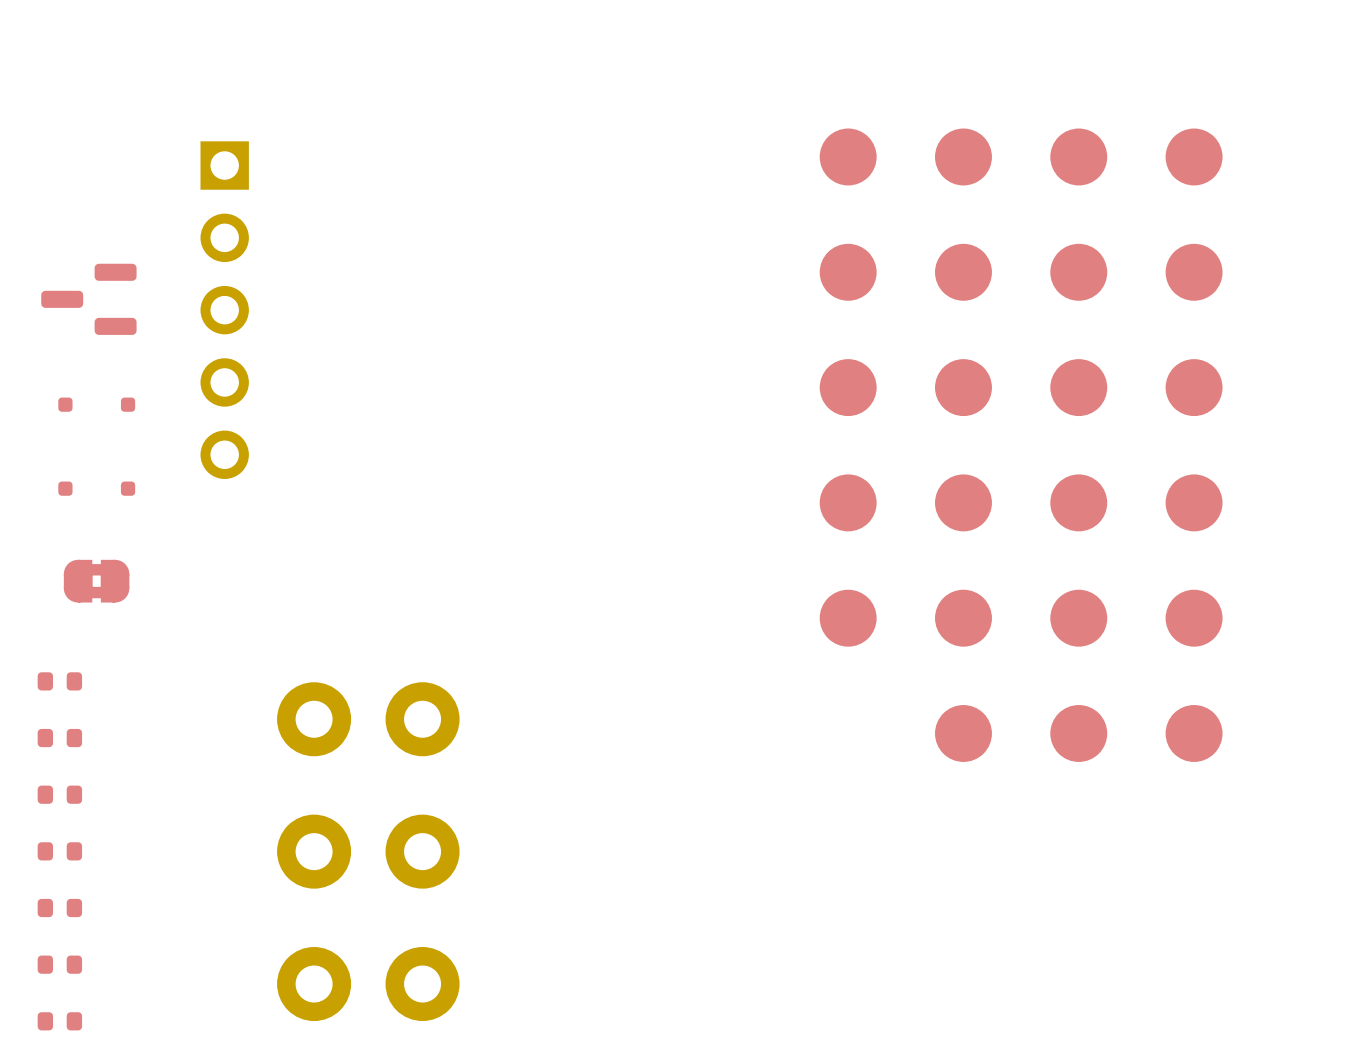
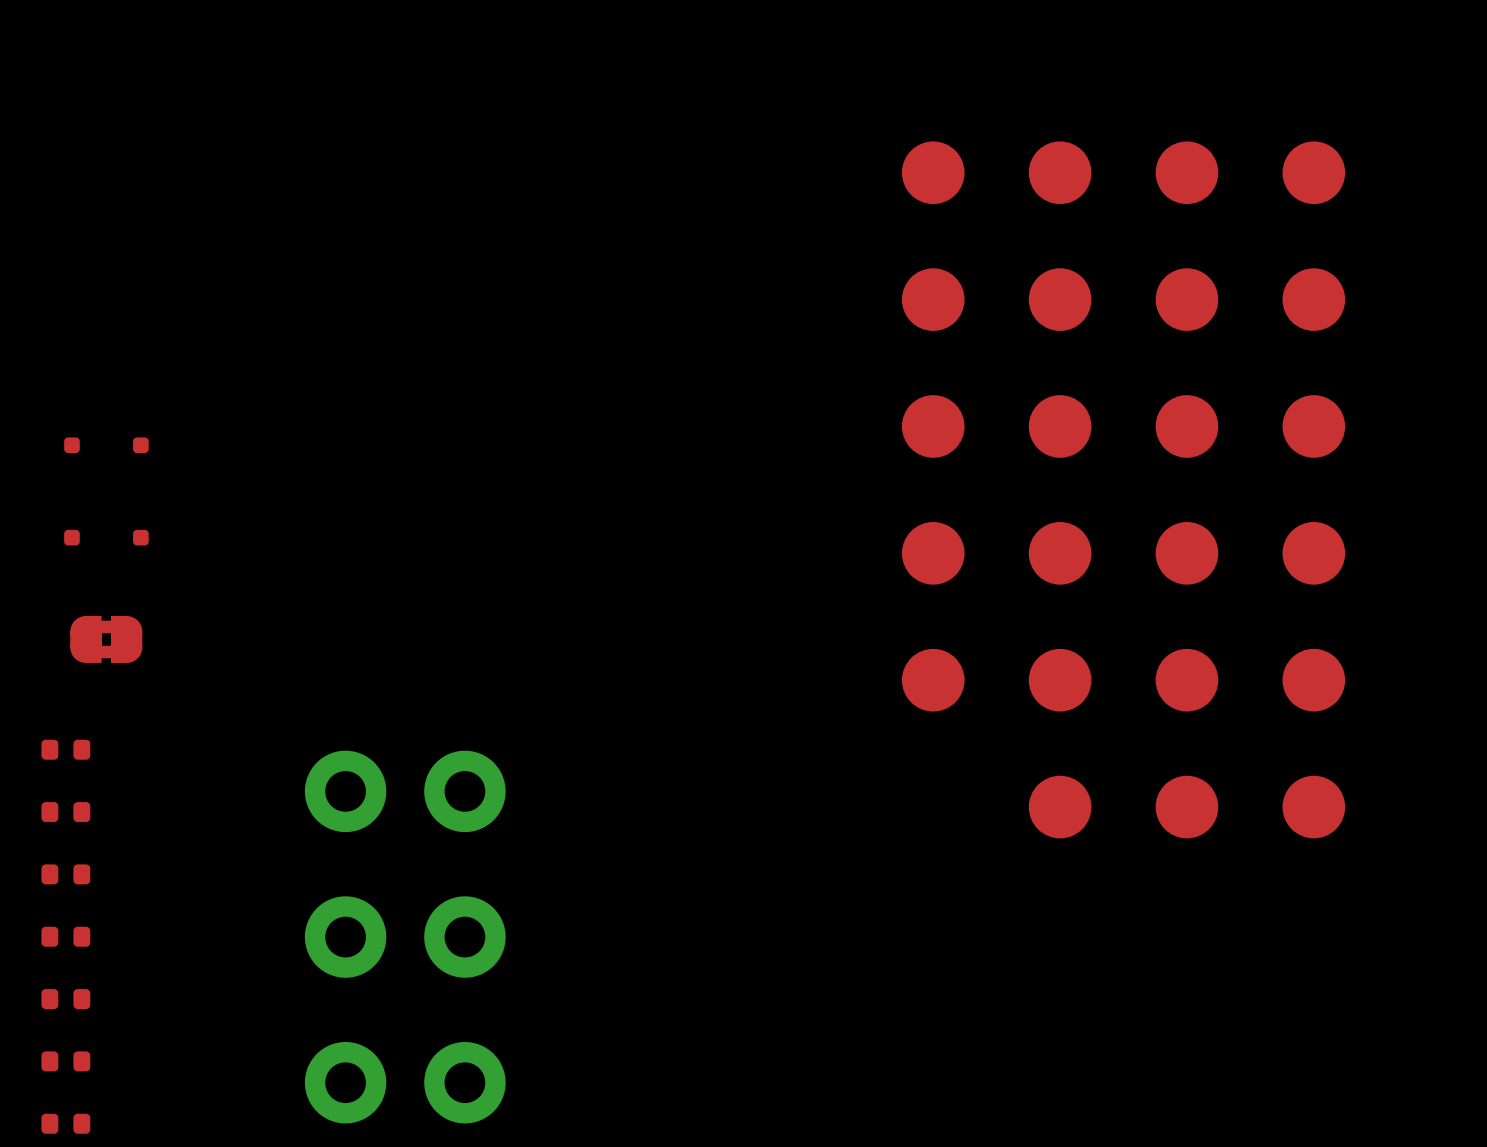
part: (88, 299) -> none
part: (224, 310) -> none

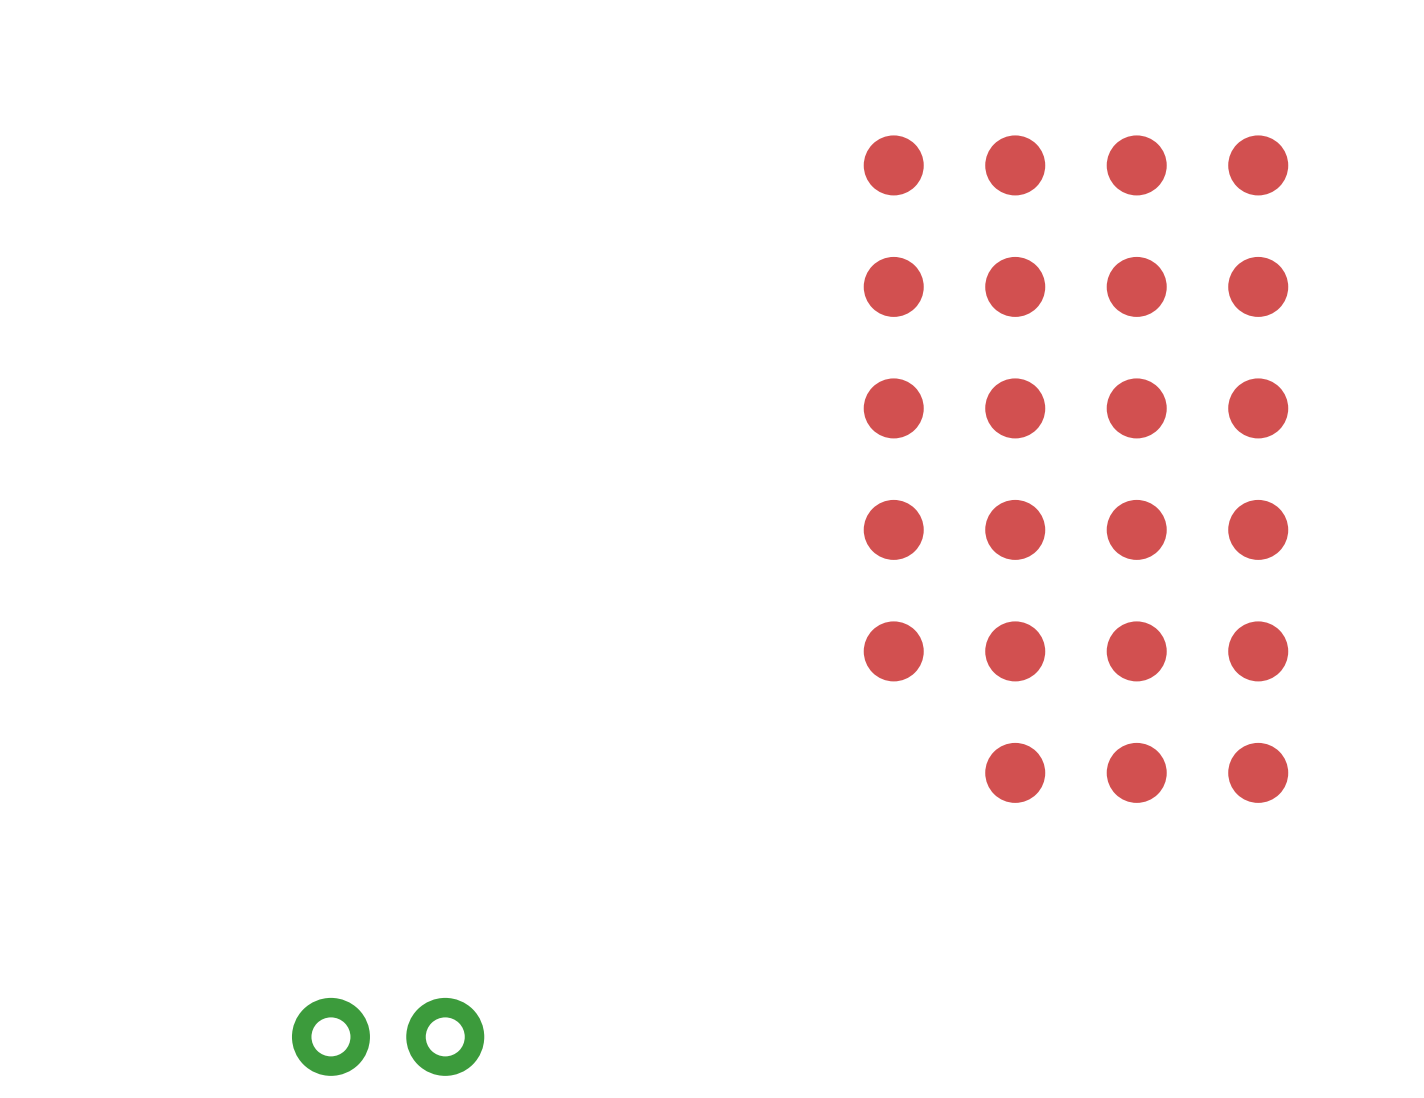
part: (106, 445) -> none
part: (106, 537) -> none
part: (106, 639) -> none
part: (65, 749) -> none
part: (405, 791) -> none
part: (65, 812) -> none
part: (65, 874) -> none
part: (65, 936) -> none
part: (405, 937) -> none
part: (65, 999) -> none
part: (65, 1061) -> none
part: (65, 1123) -> none

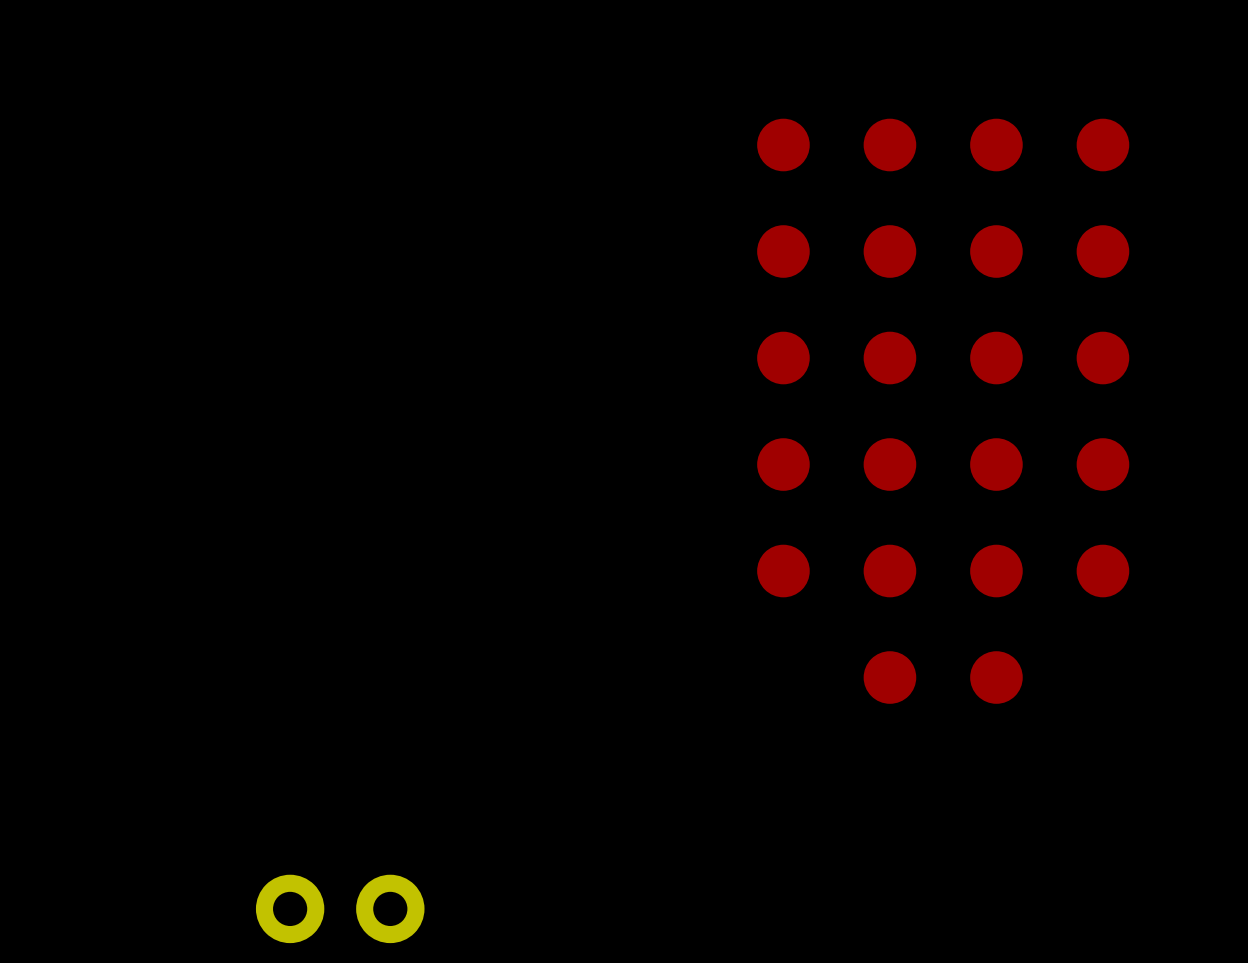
part: (1258, 772) -> none

